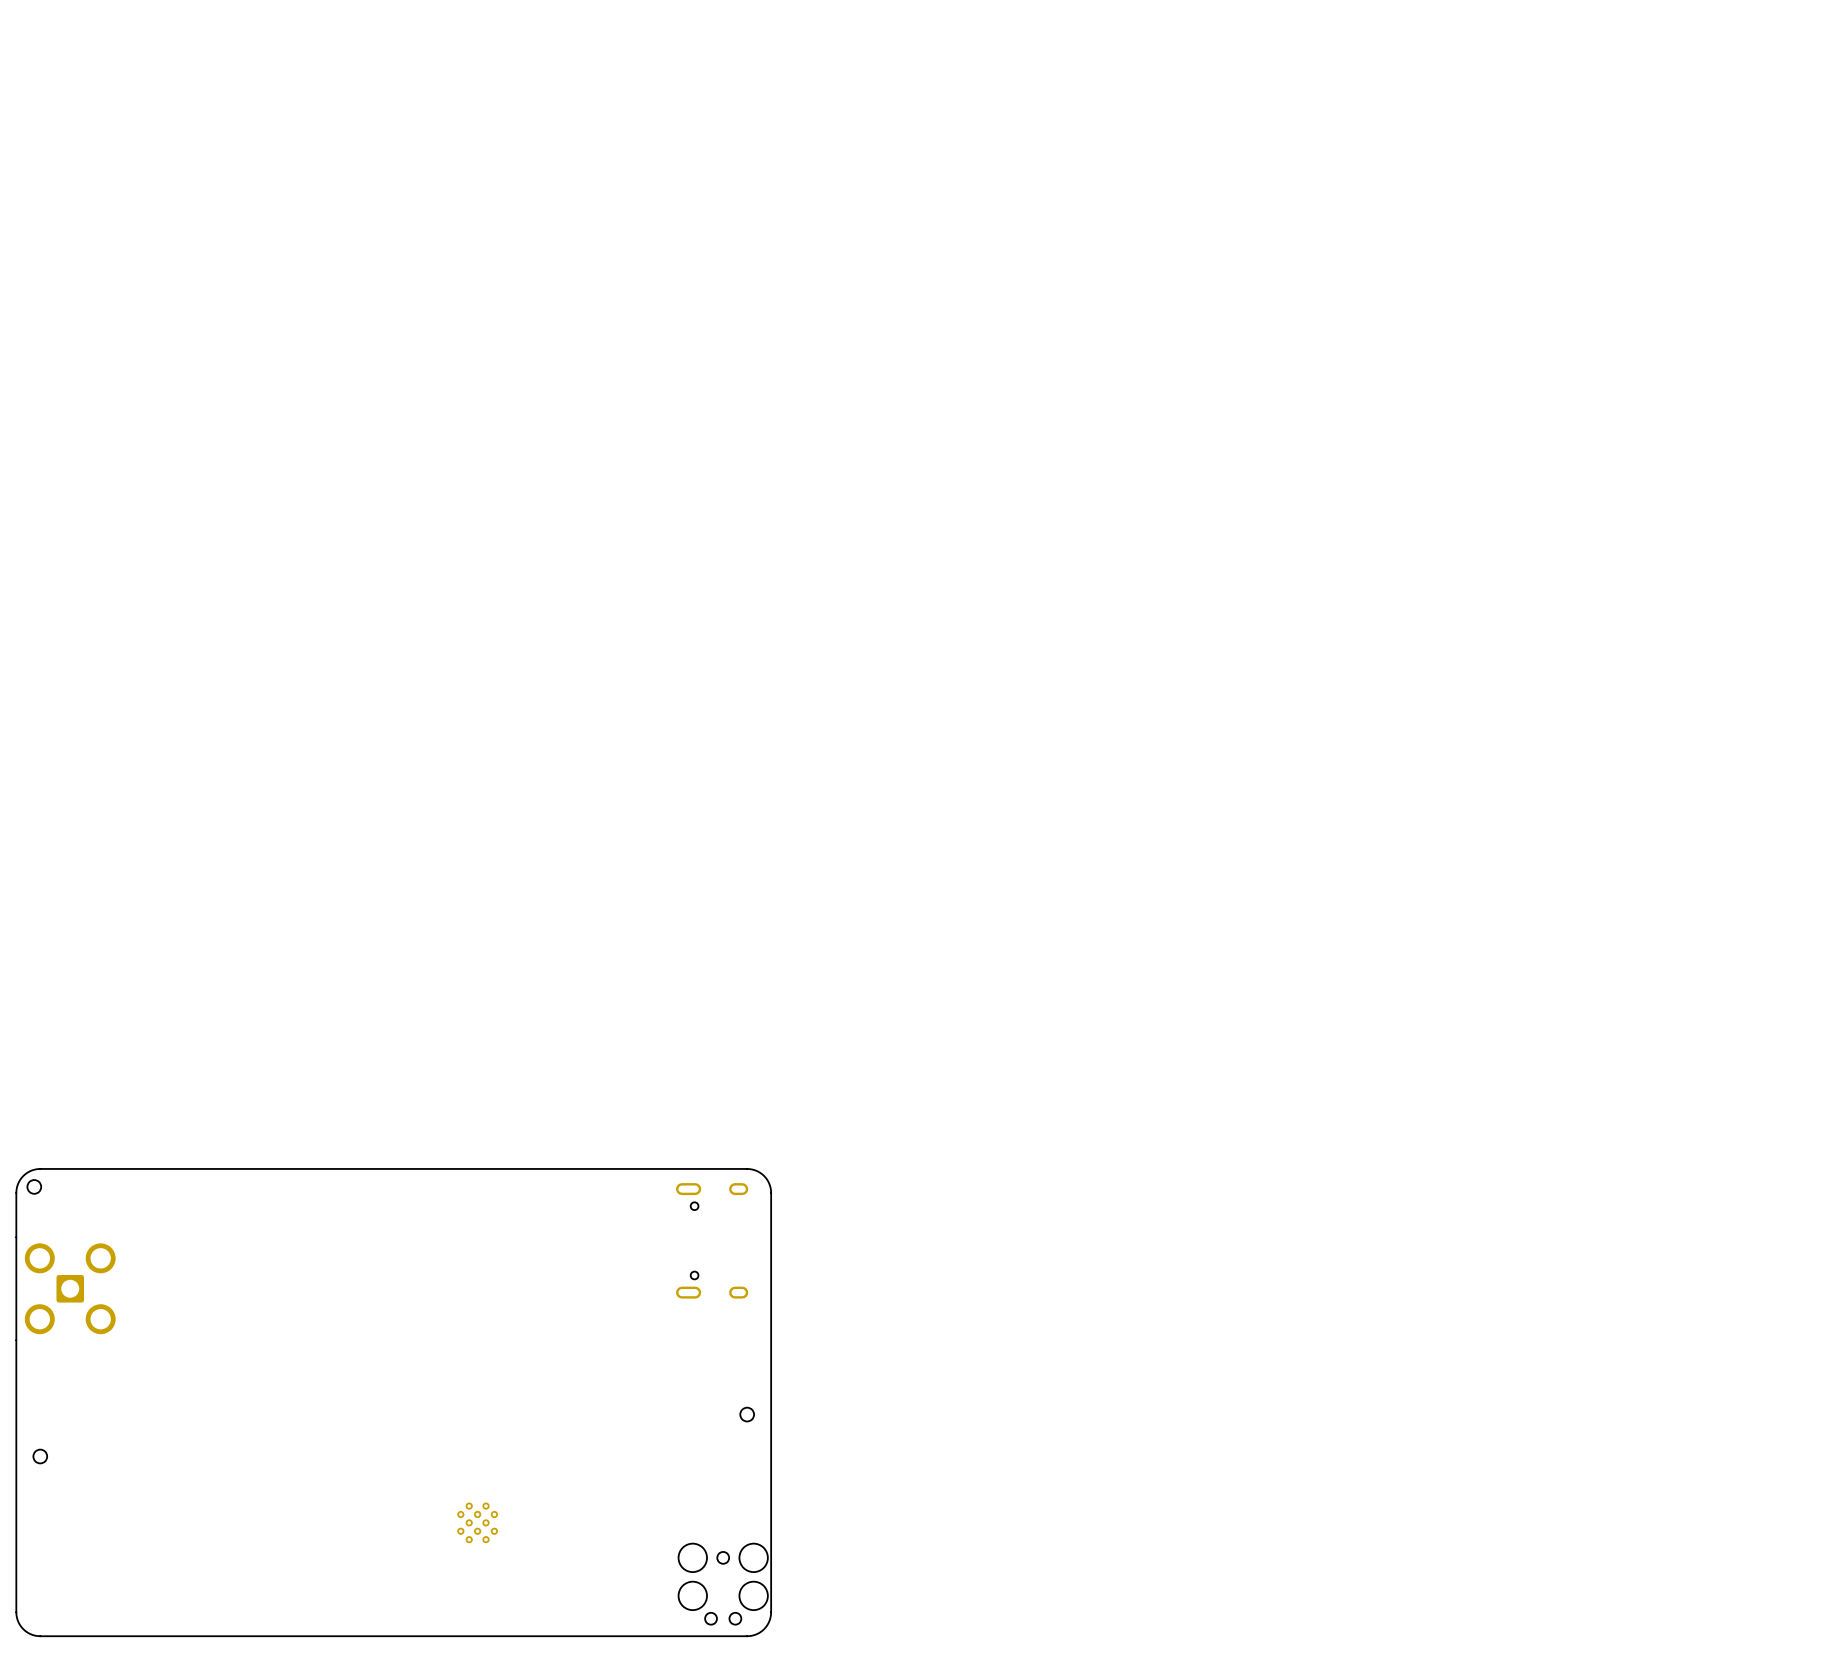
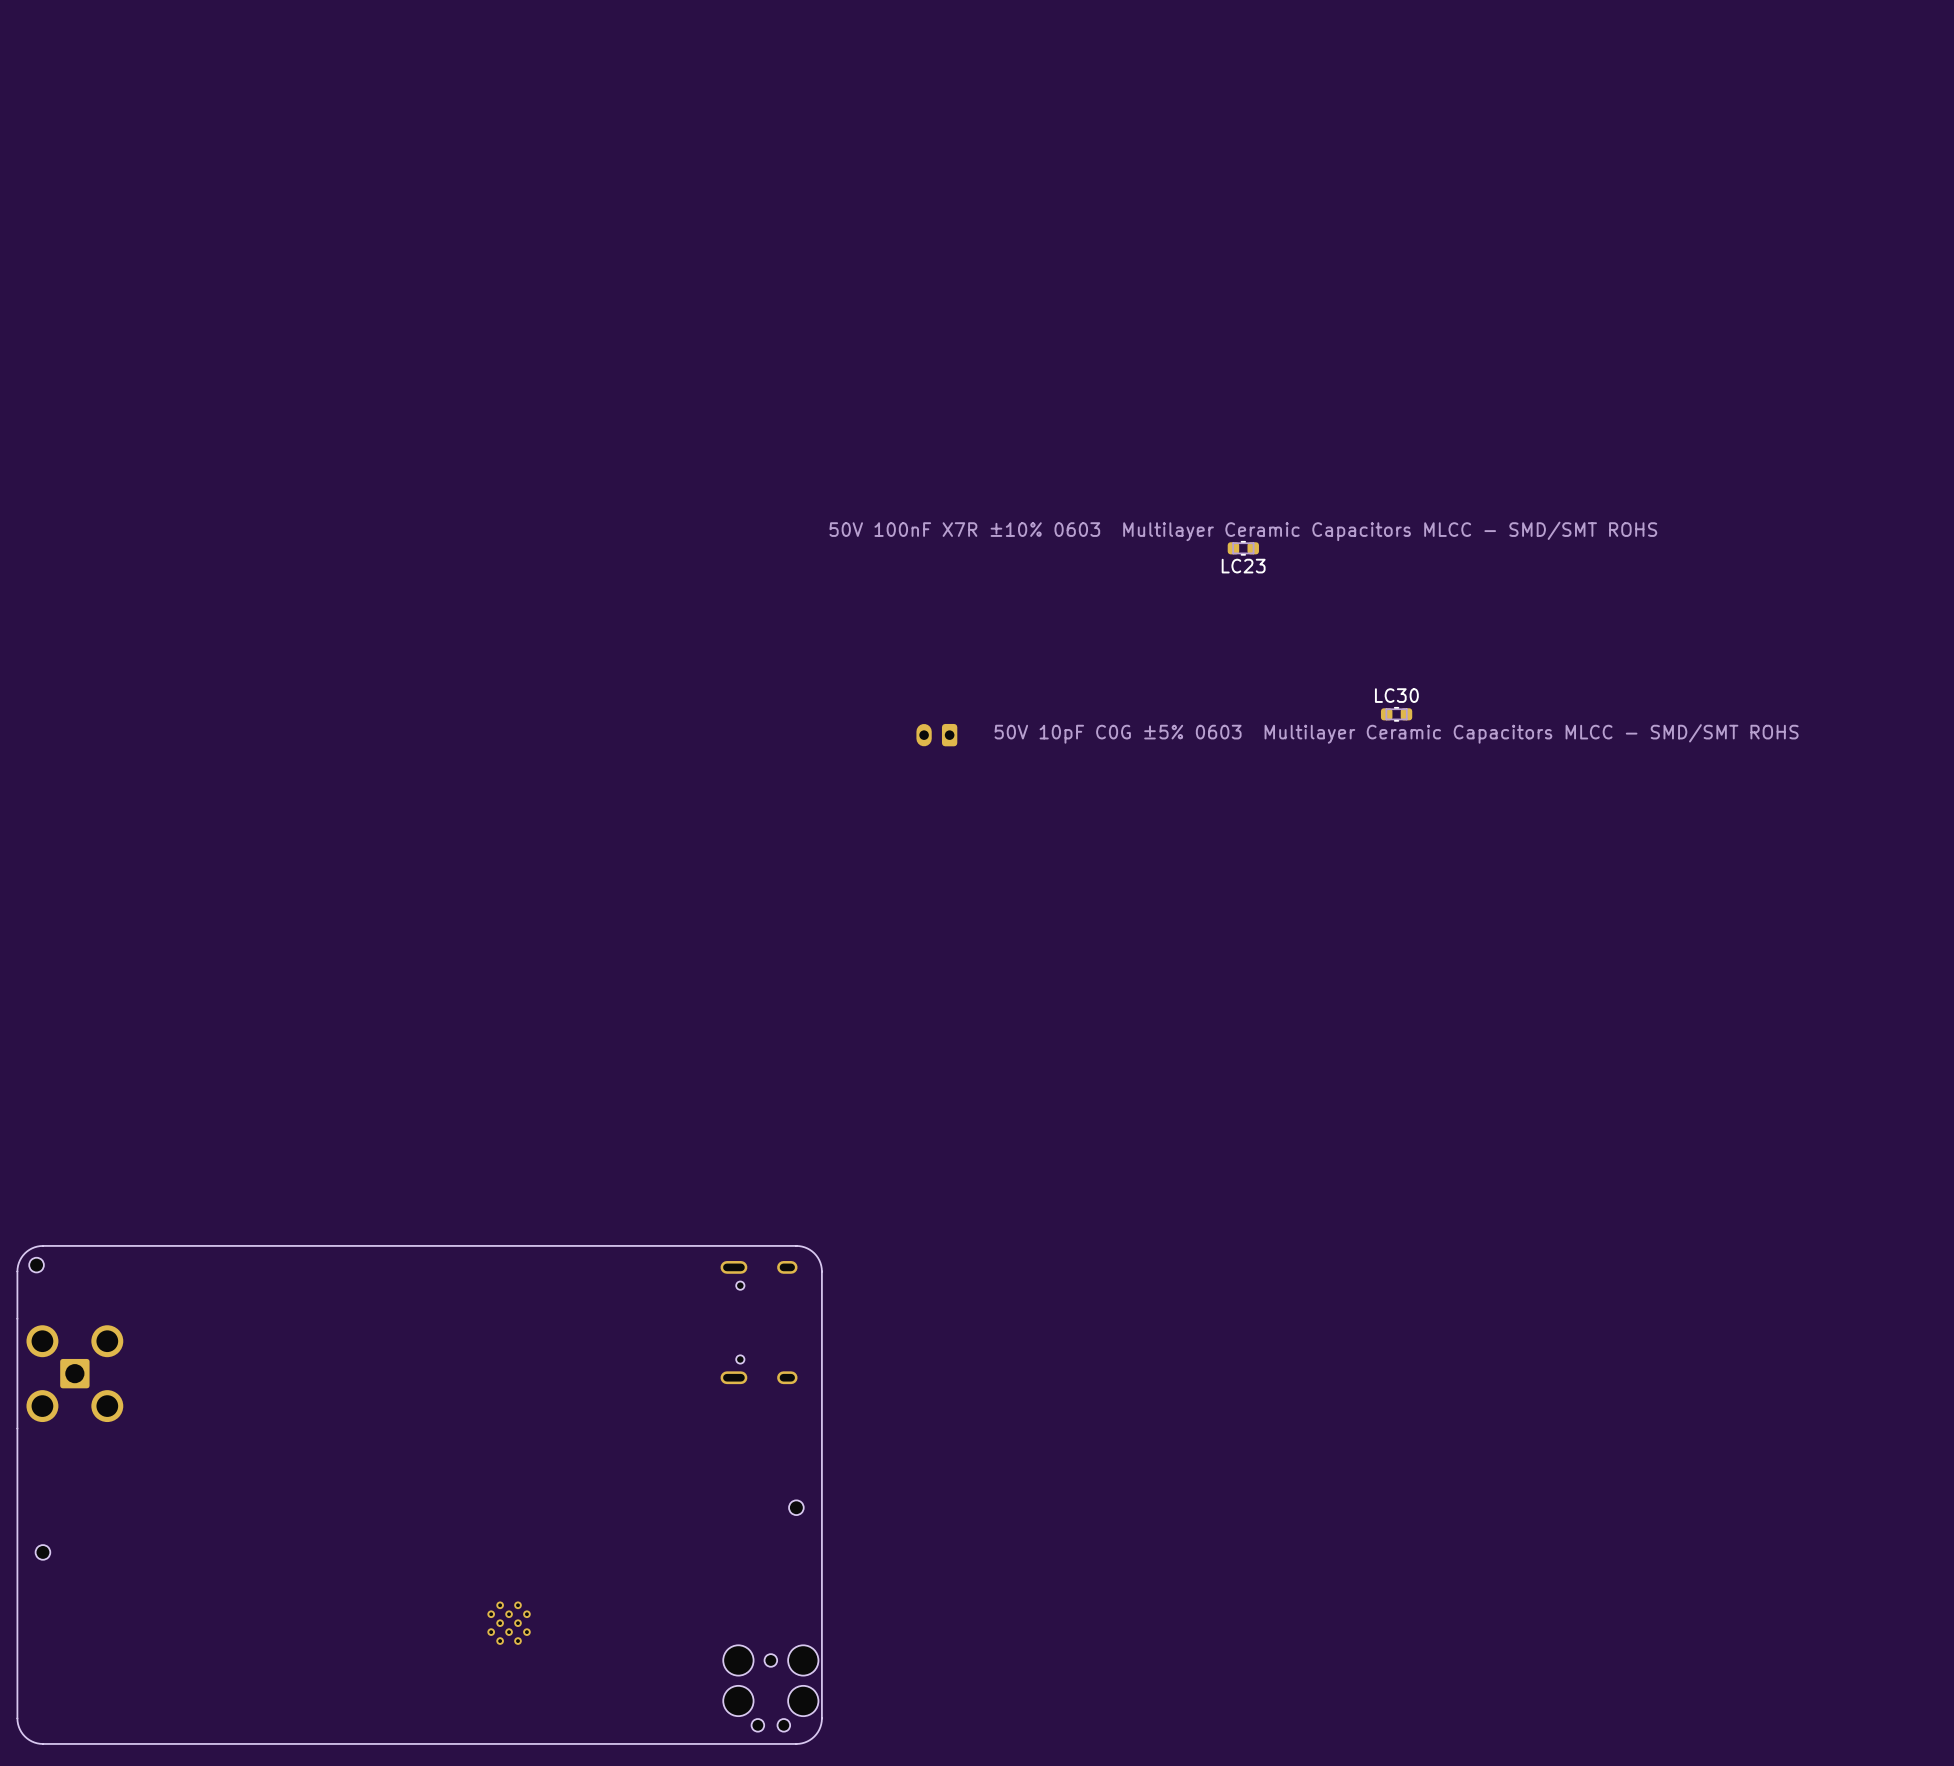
LC23: none -> 50V 100nF X7R ±10% 0603 Multilayer Ceramic Capacitors MLCC - SMD/SMT ROHS (1243, 548)
LC30: none -> 50V 10pF C0G ±5% 0603 Multilayer Ceramic Capacitors MLCC - SMD/SMT ROHS (1396, 714)
part: none -> (936, 735)

